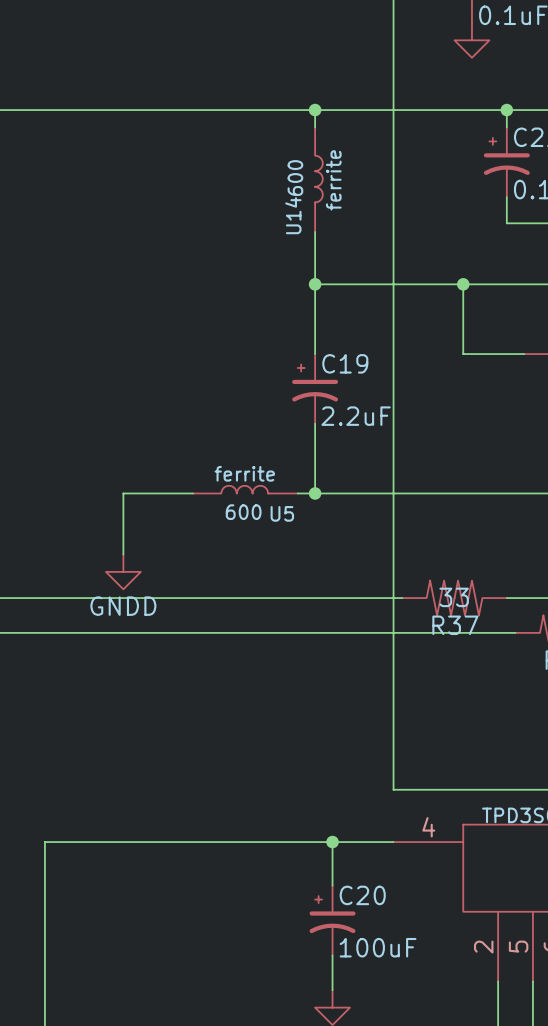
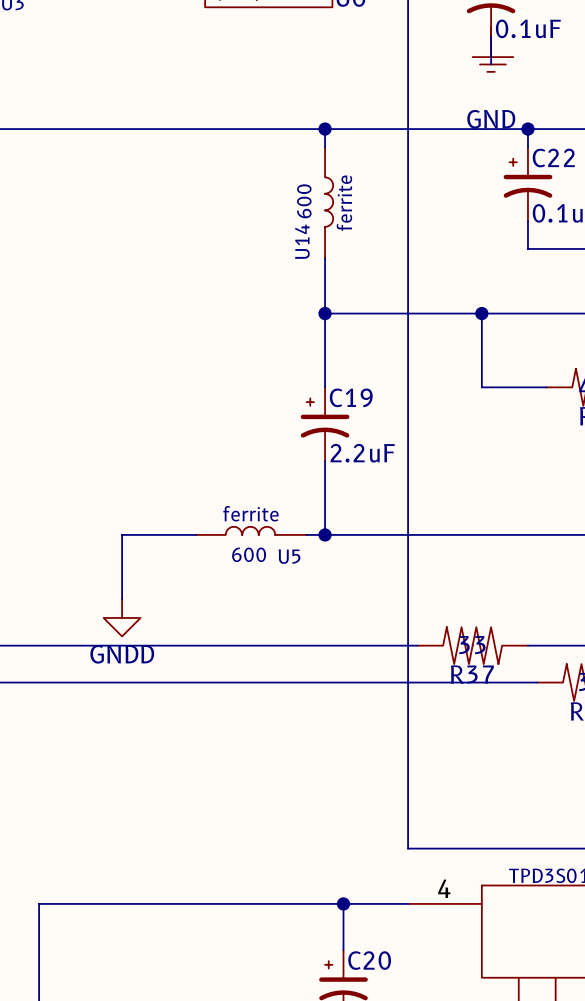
power symbol shape: [454, 22, 490, 58] -> [472, 27, 514, 72]
power symbol text: none -> GND (491, 119)

